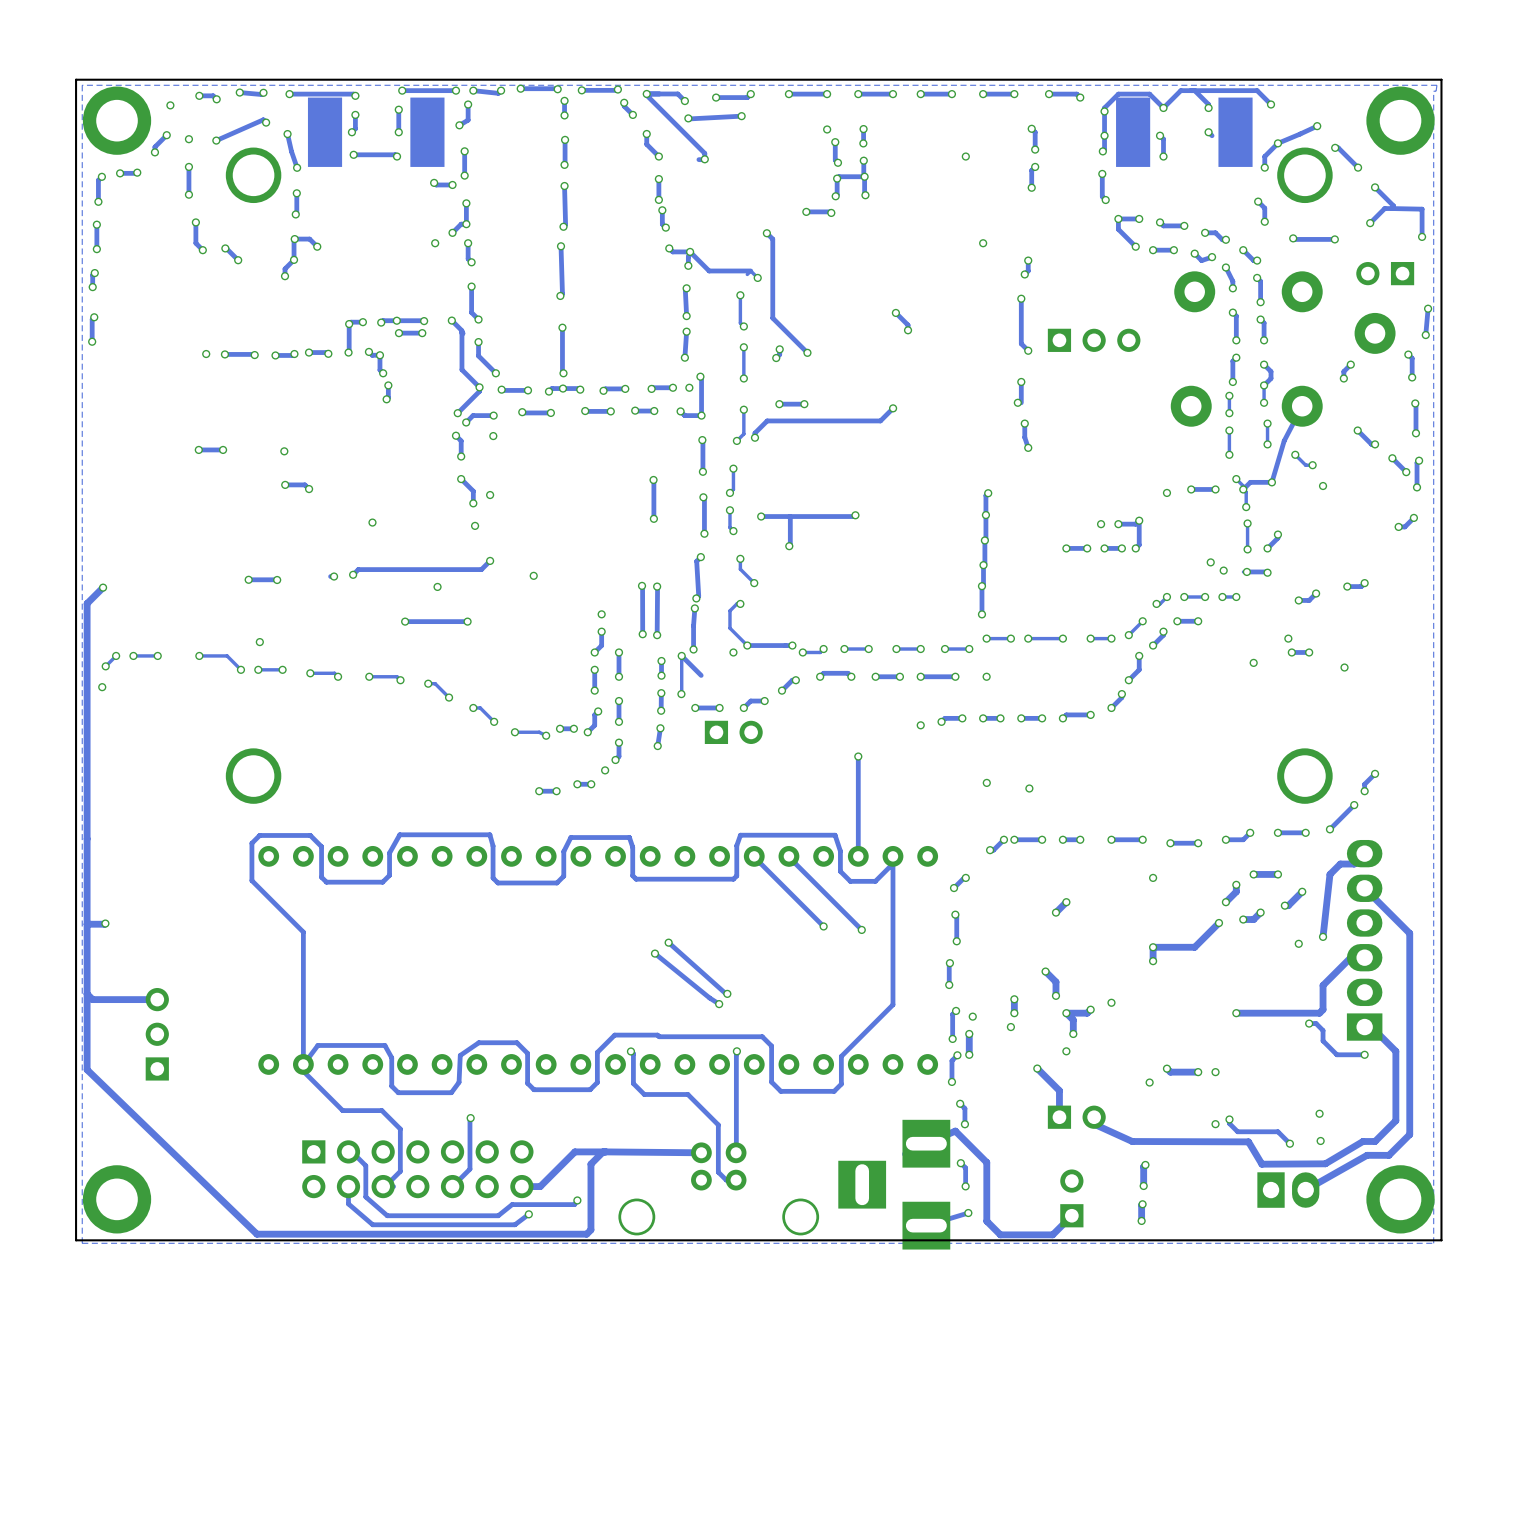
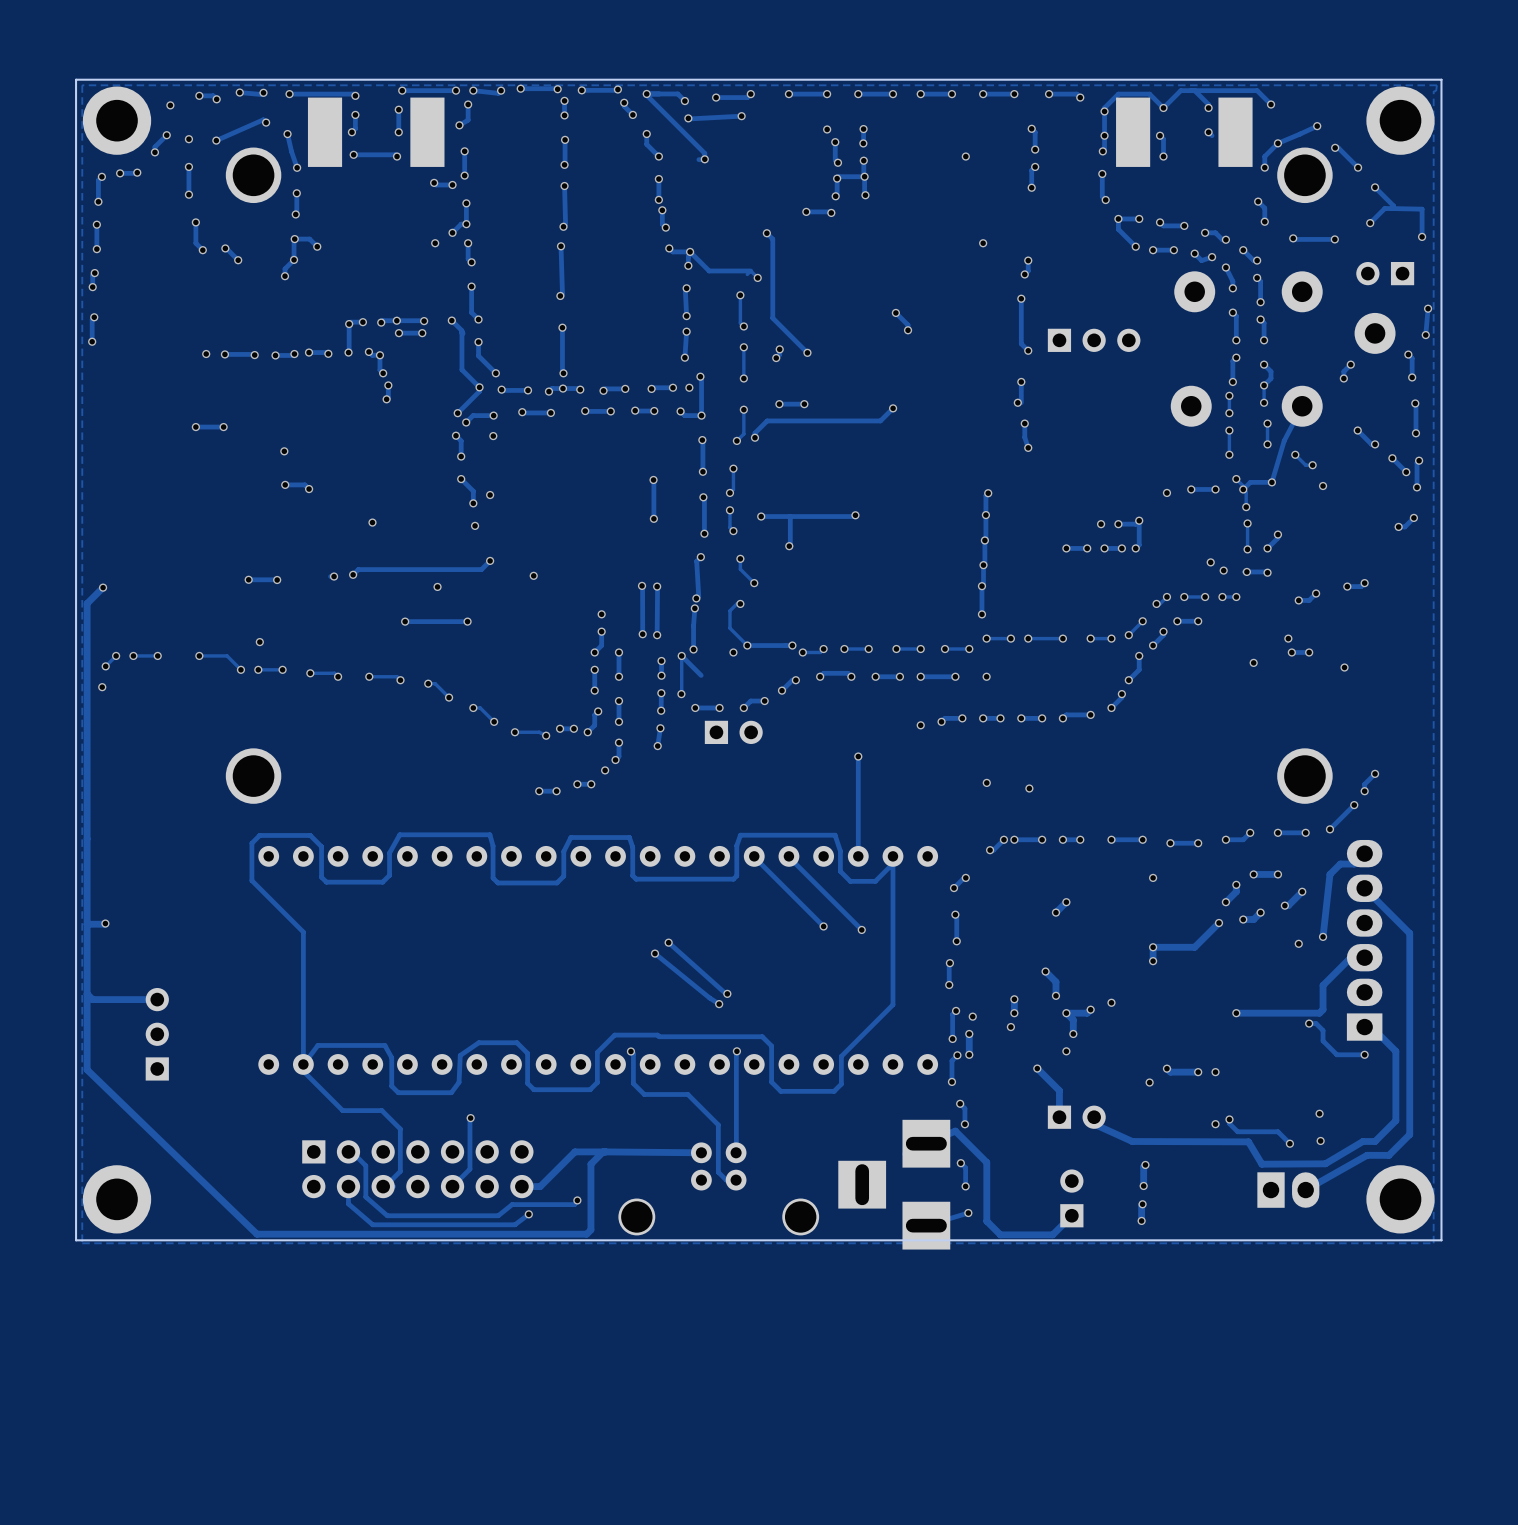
via: none -> (195, 427)
track: none -> (223, 427) (195, 427)
via: none -> (223, 427)
via: (198, 449) -> none
track: (223, 449) (198, 449) -> none
via: (223, 449) -> none

